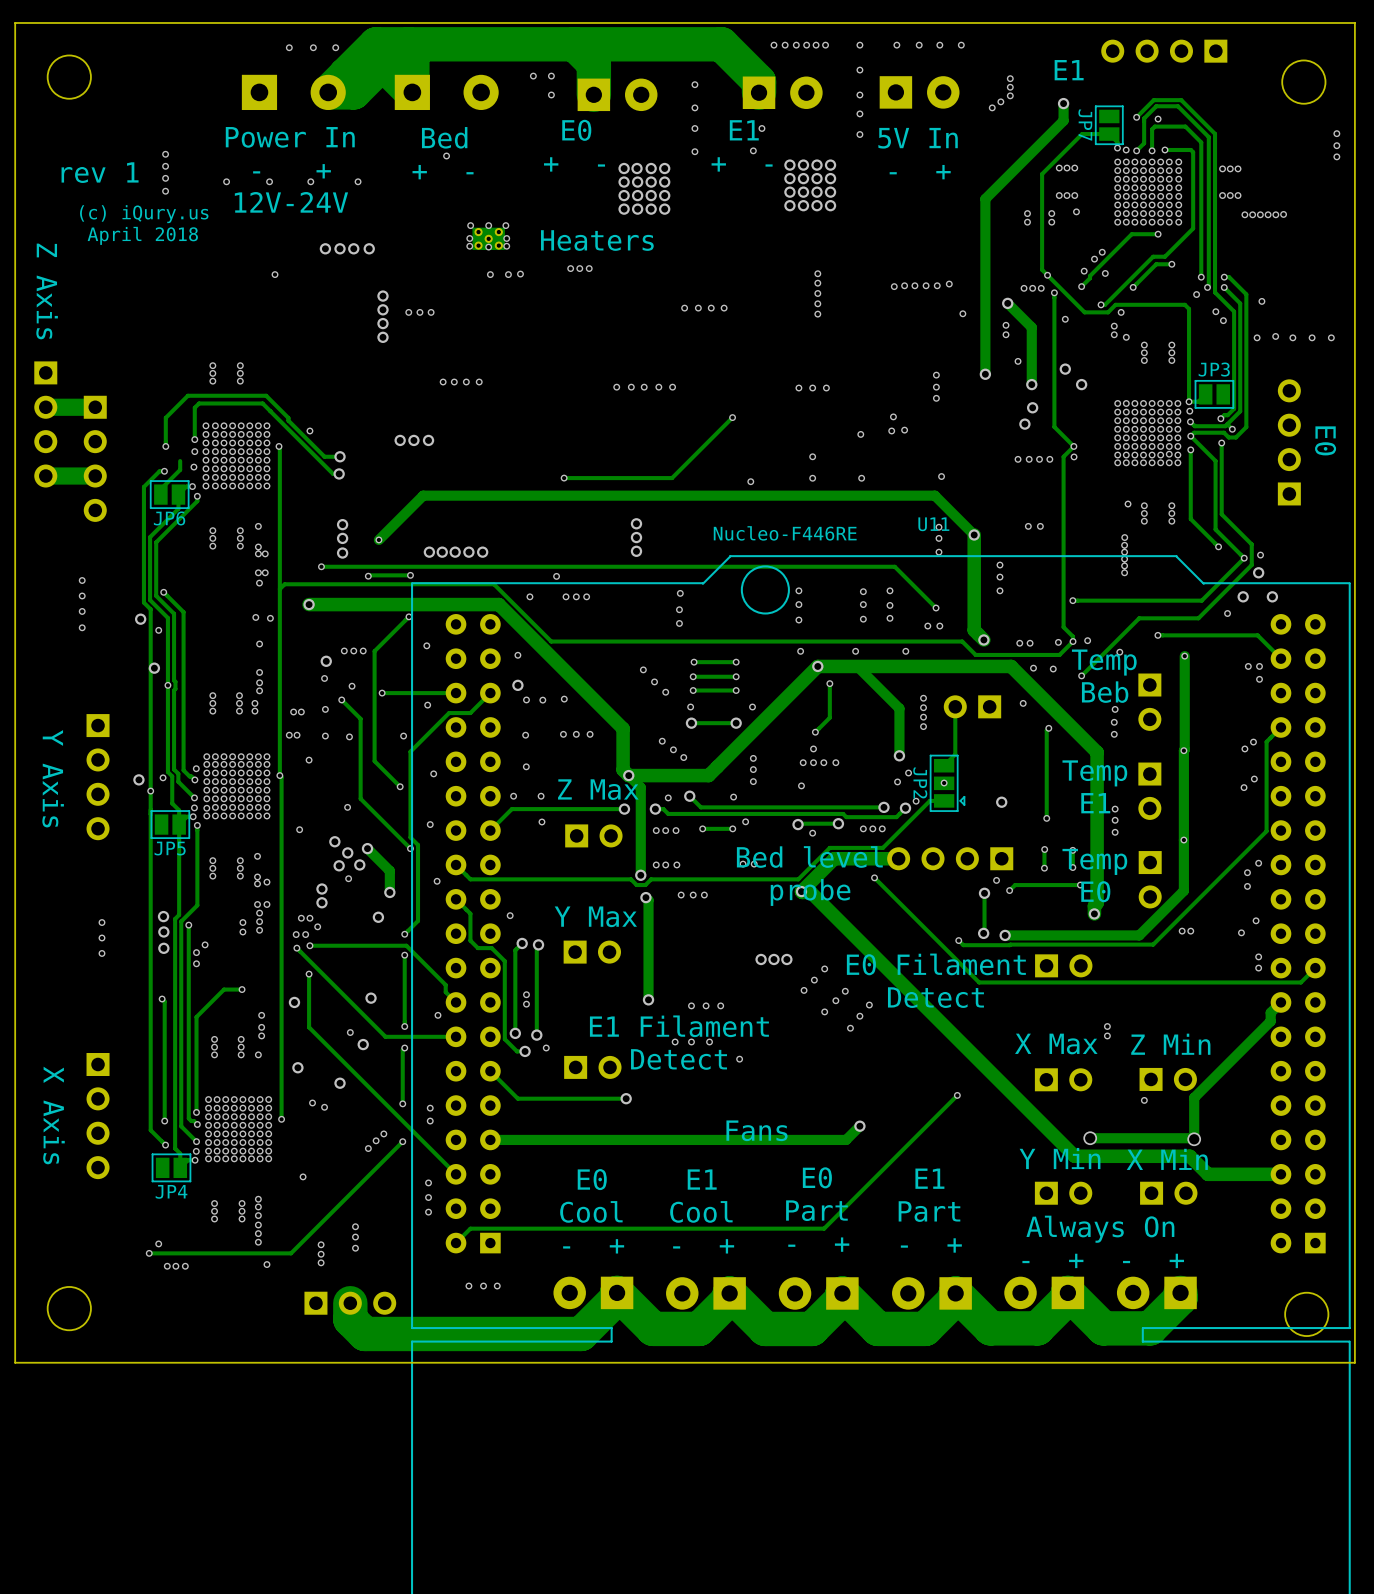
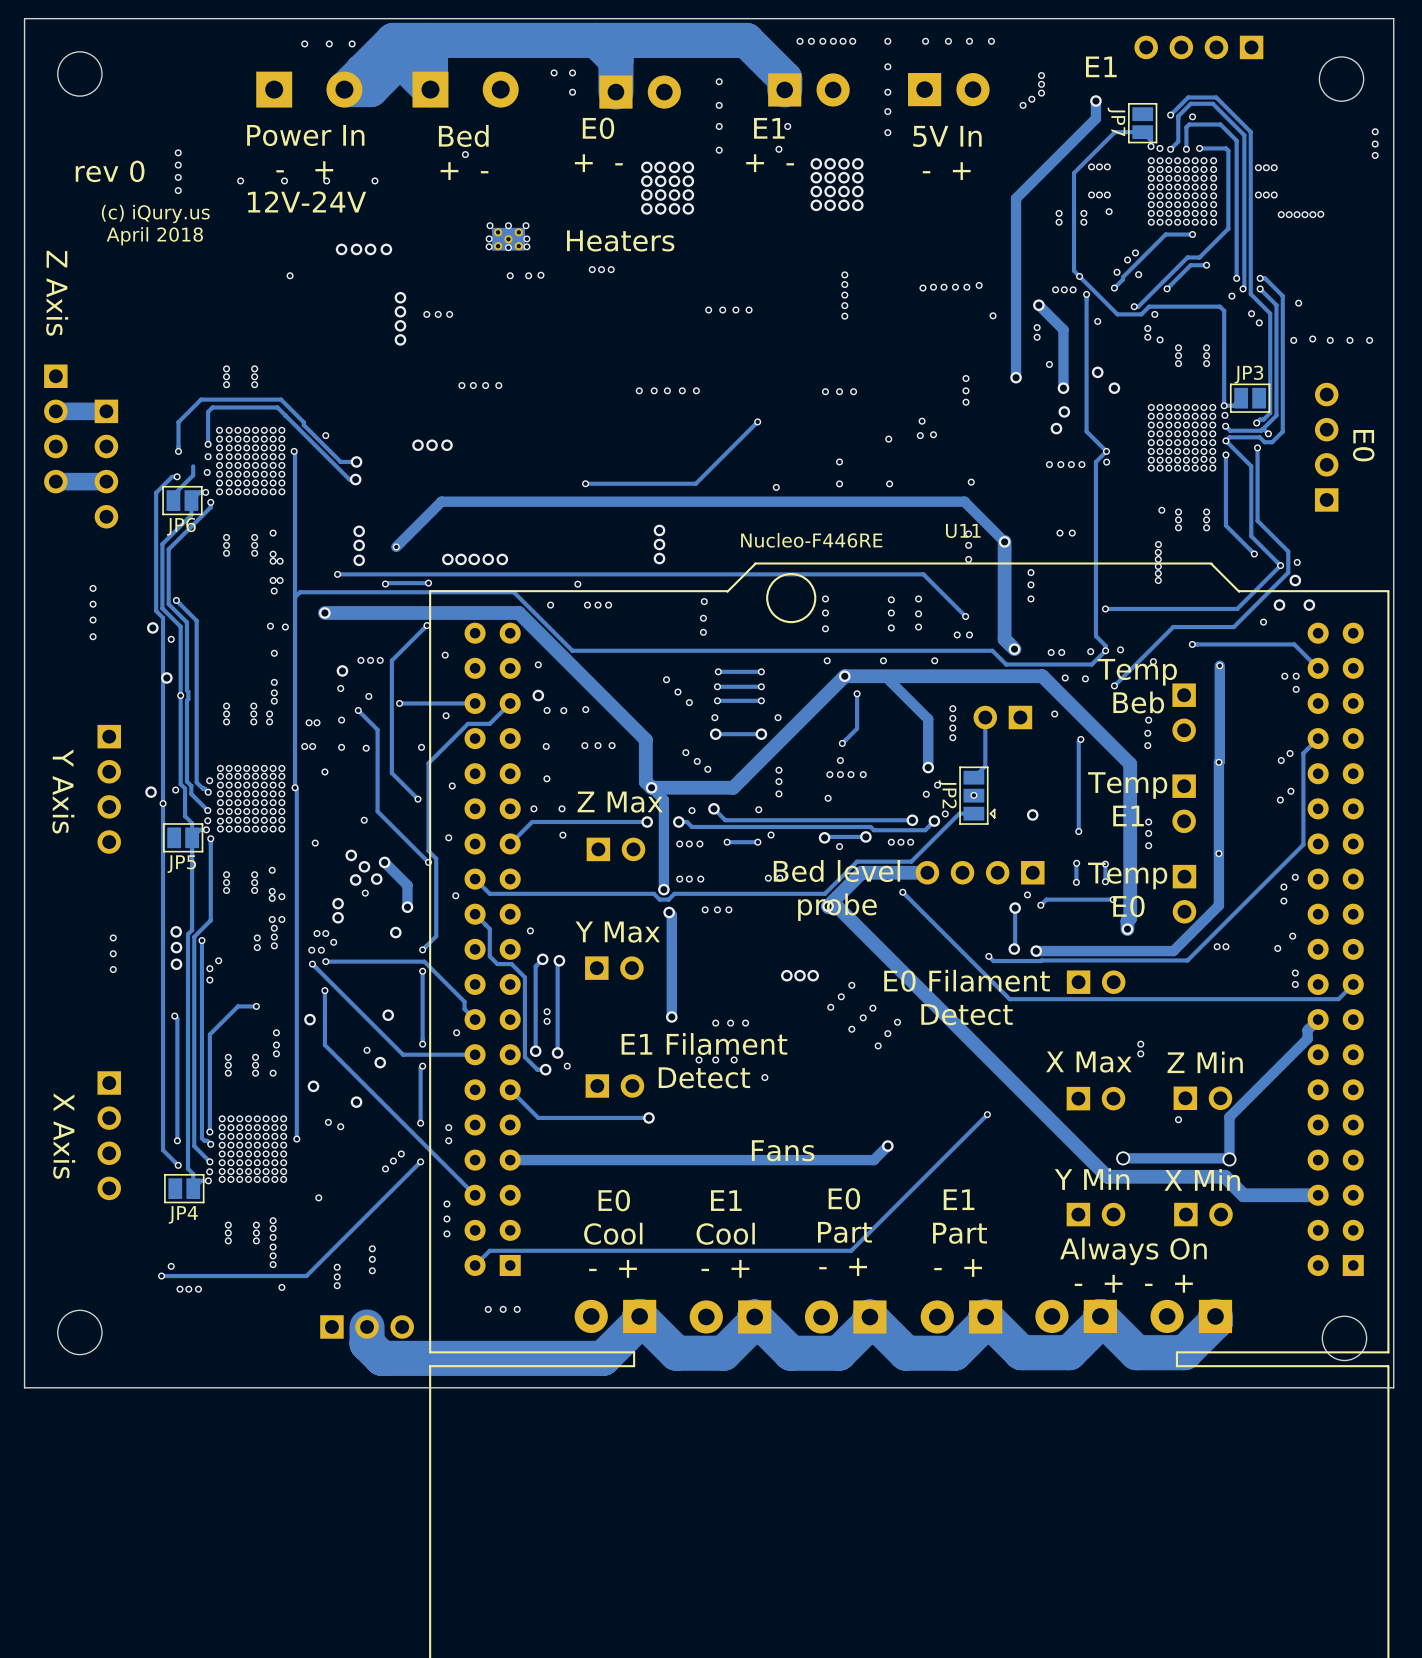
text: rev 1 (100, 172) -> rev 0 (110, 171)

